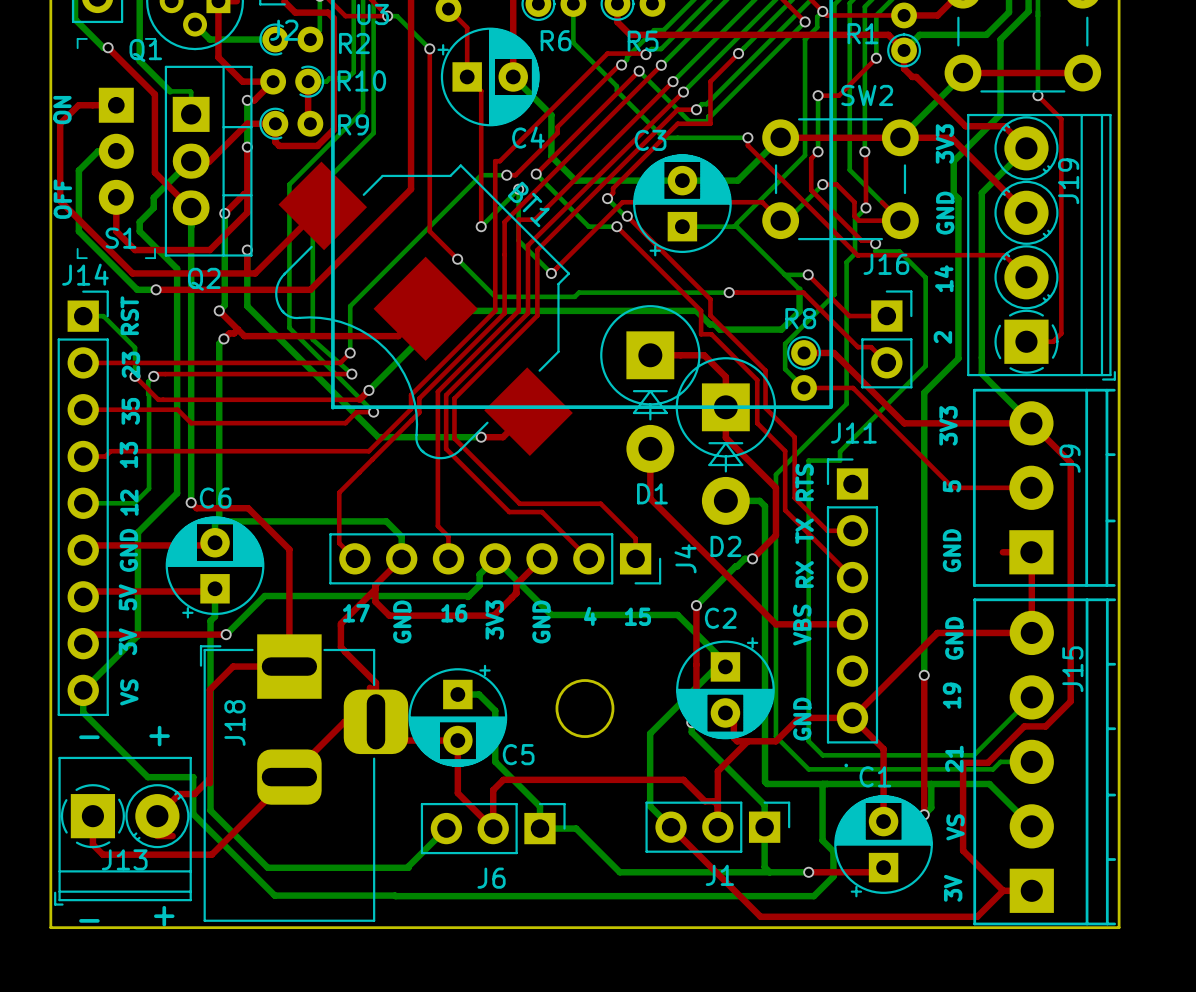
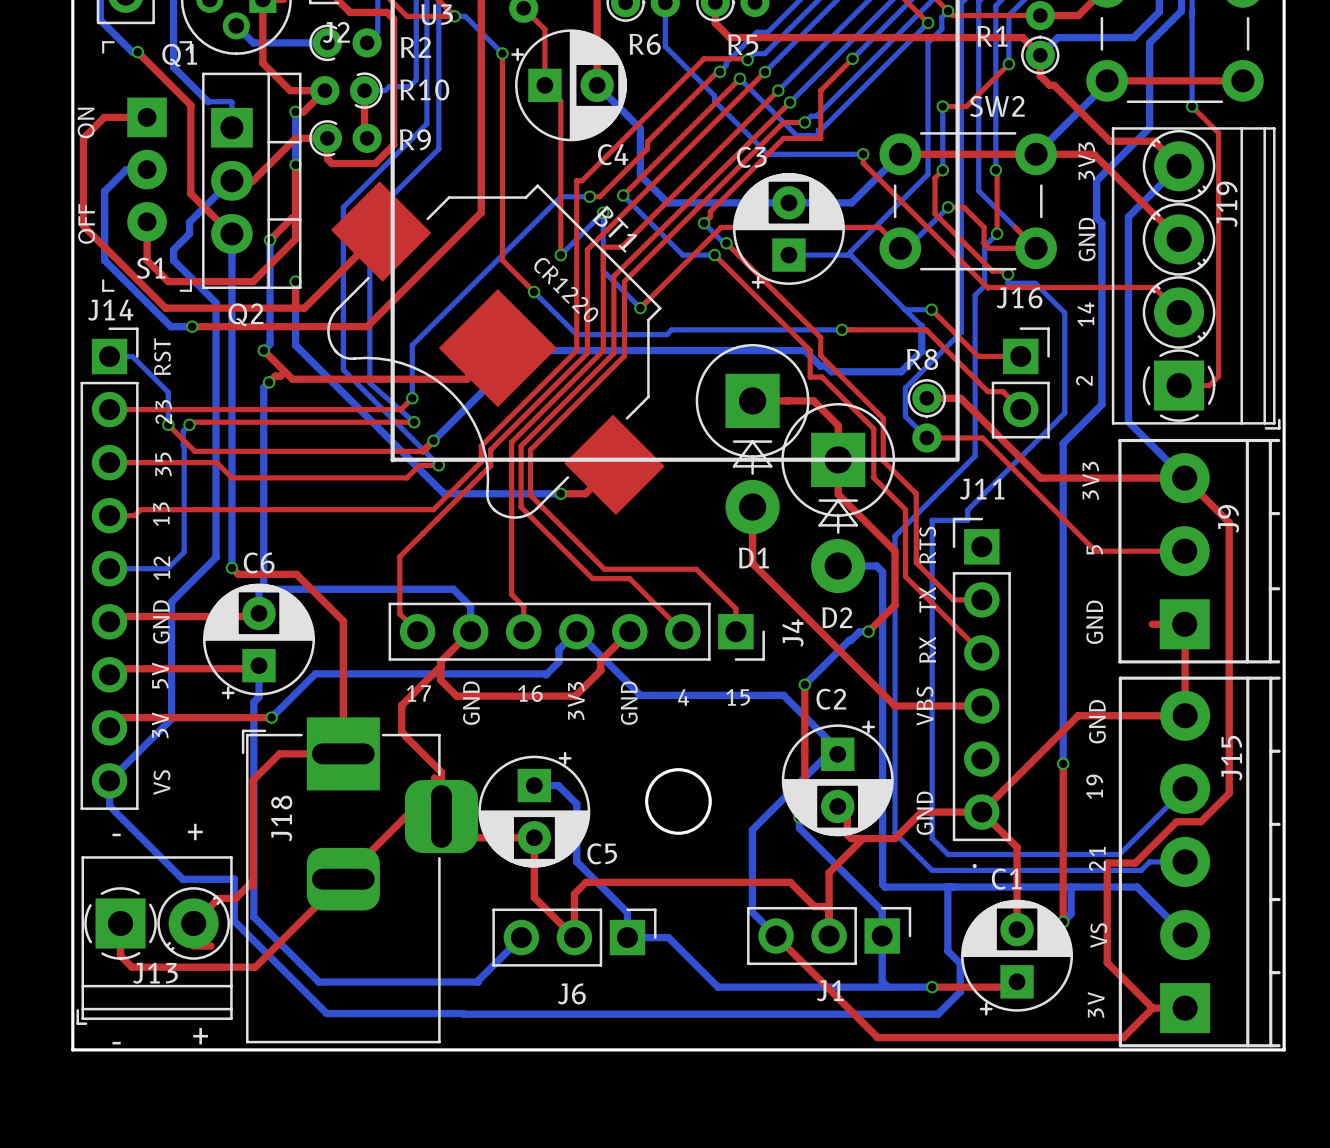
text: none -> CR1220 (566, 289)

